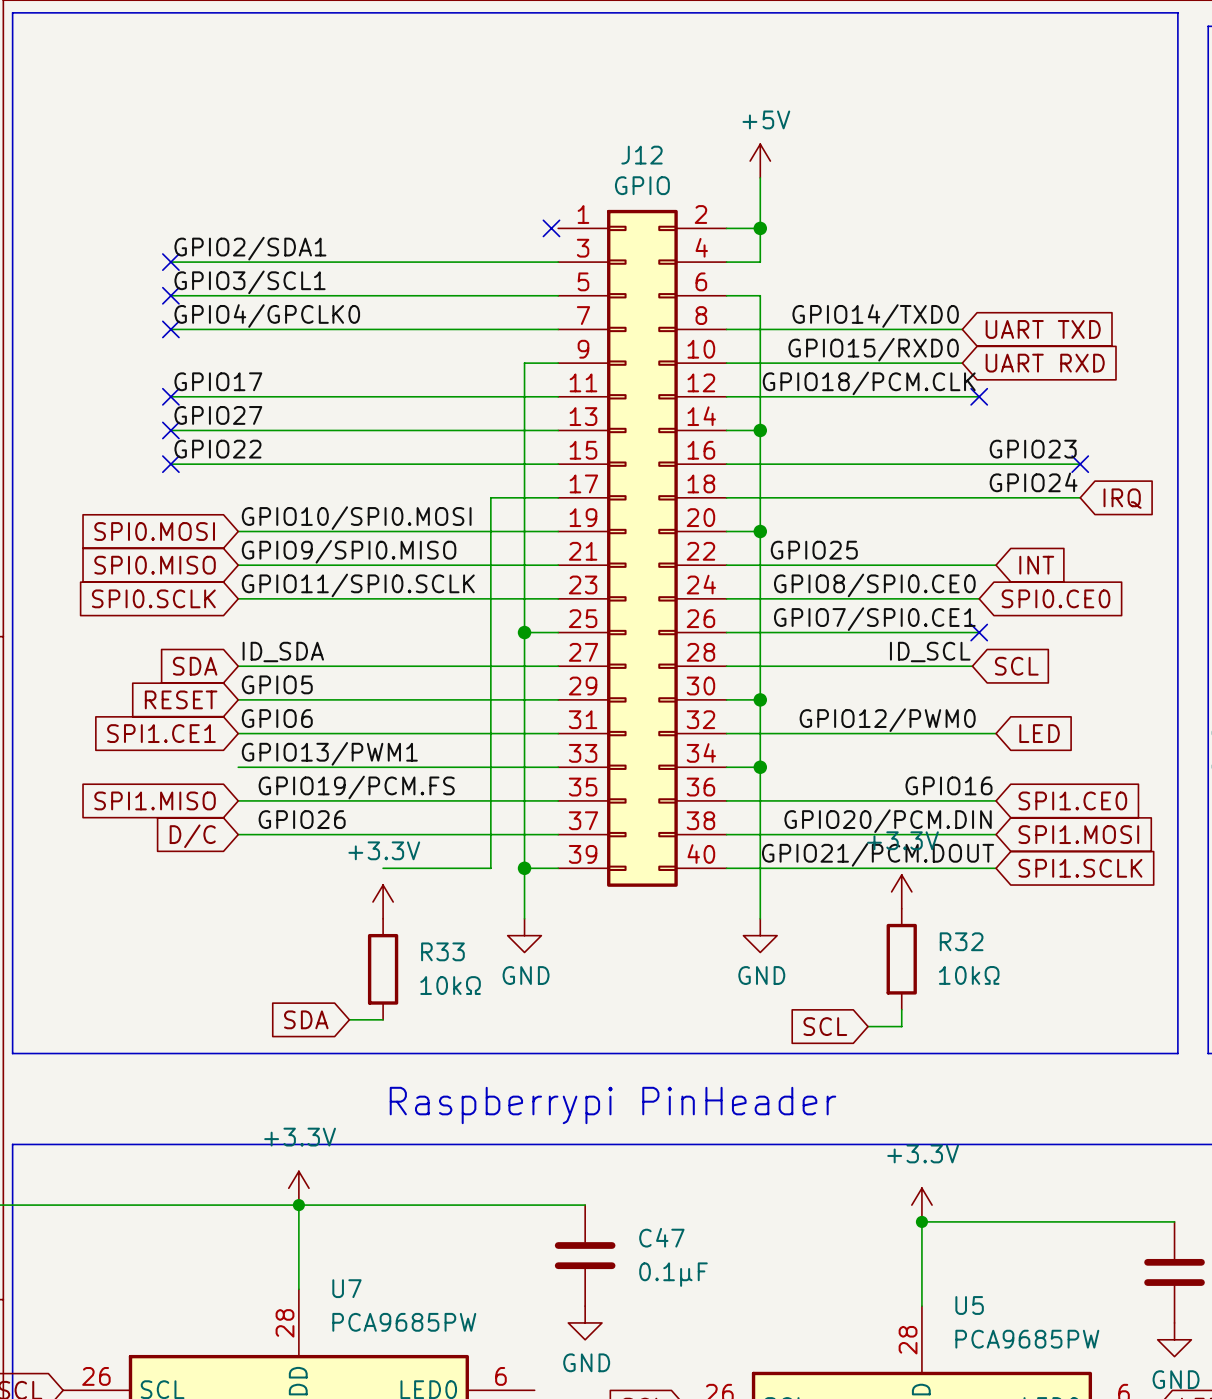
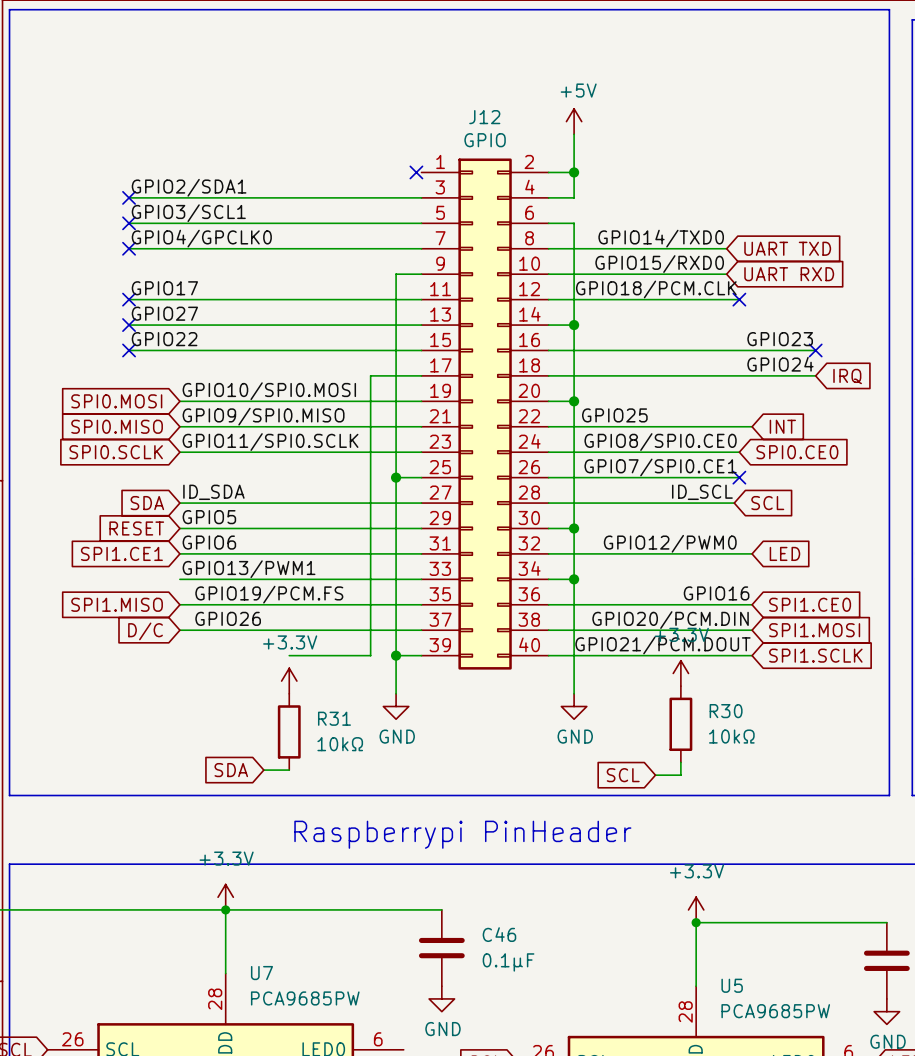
R32 name: R32 (961, 941) -> R30 (726, 711)
R33 name: R33 (442, 951) -> R31 (334, 718)
C47 name: C47 (661, 1237) -> C46 (499, 934)

